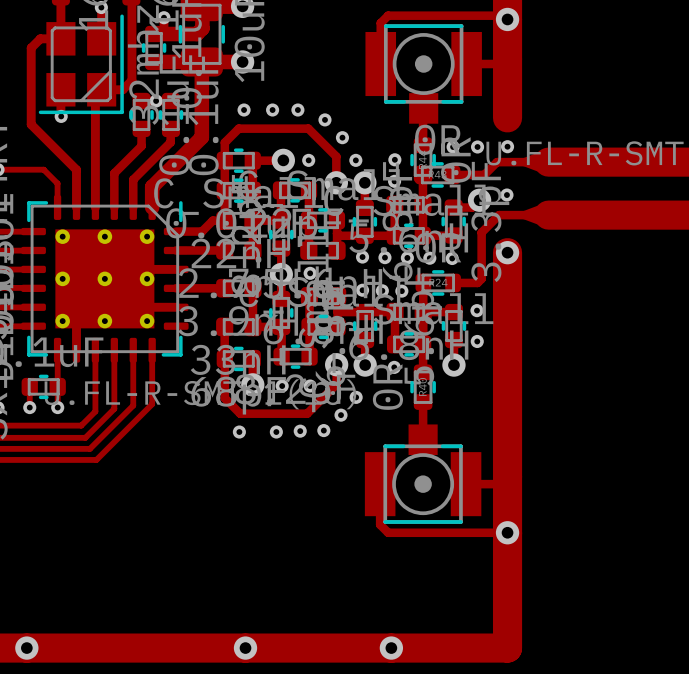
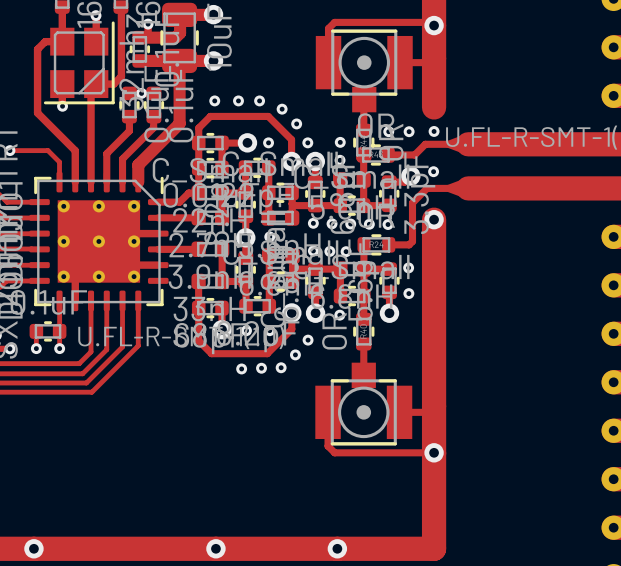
via: (239, 432) -> none

